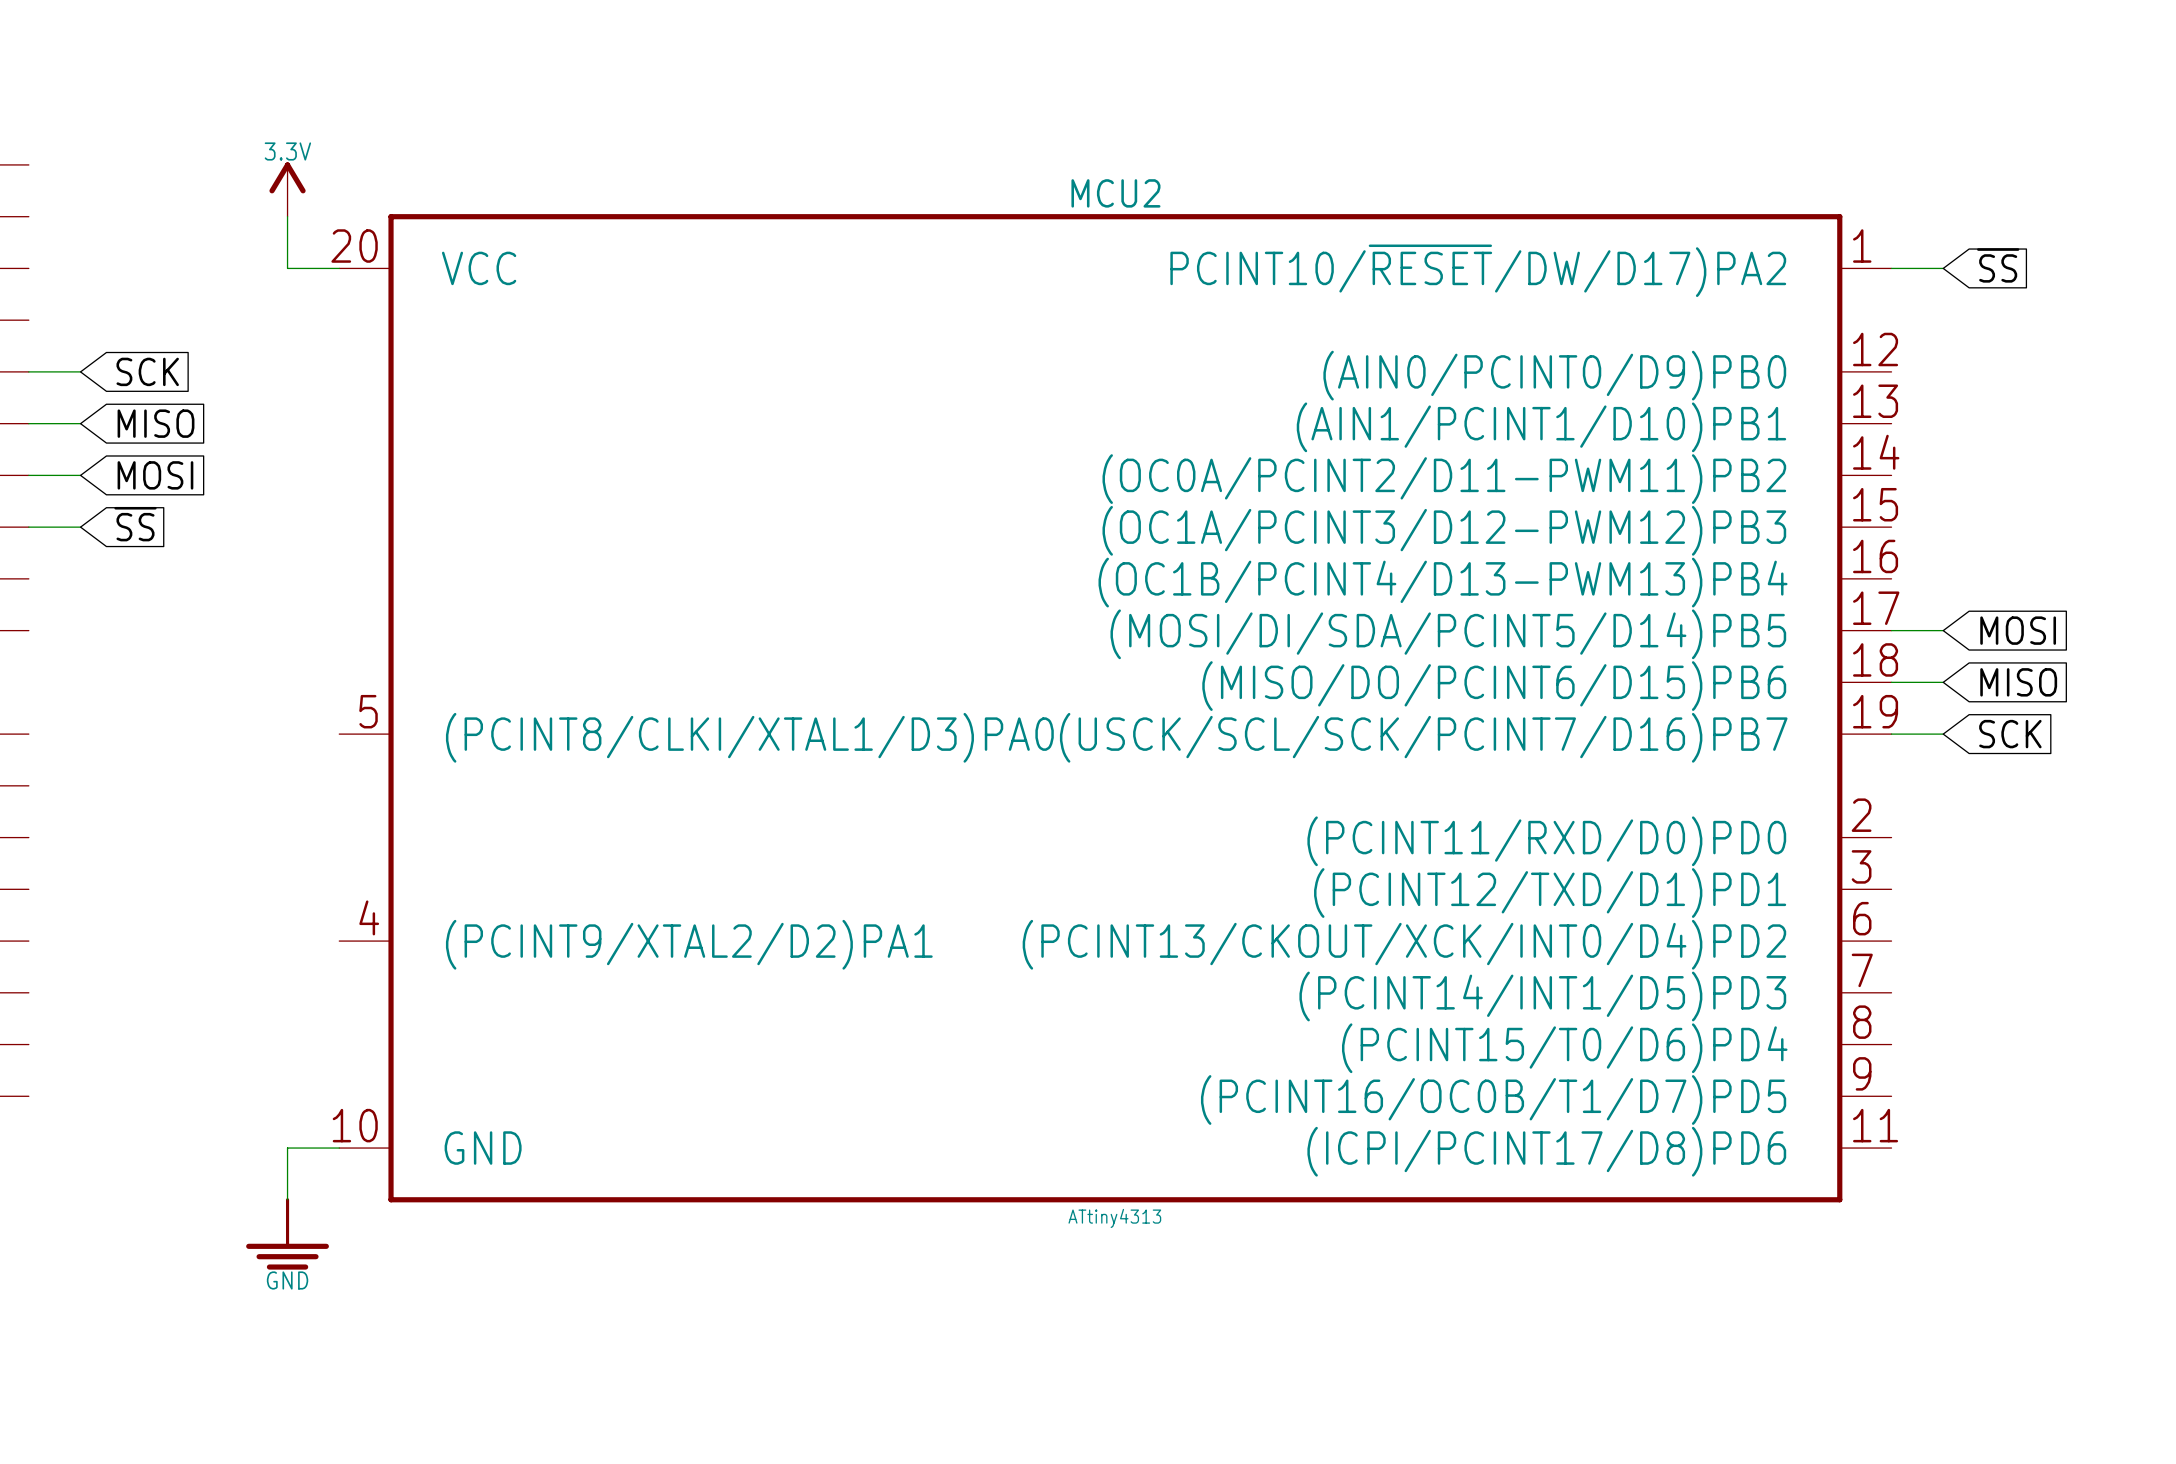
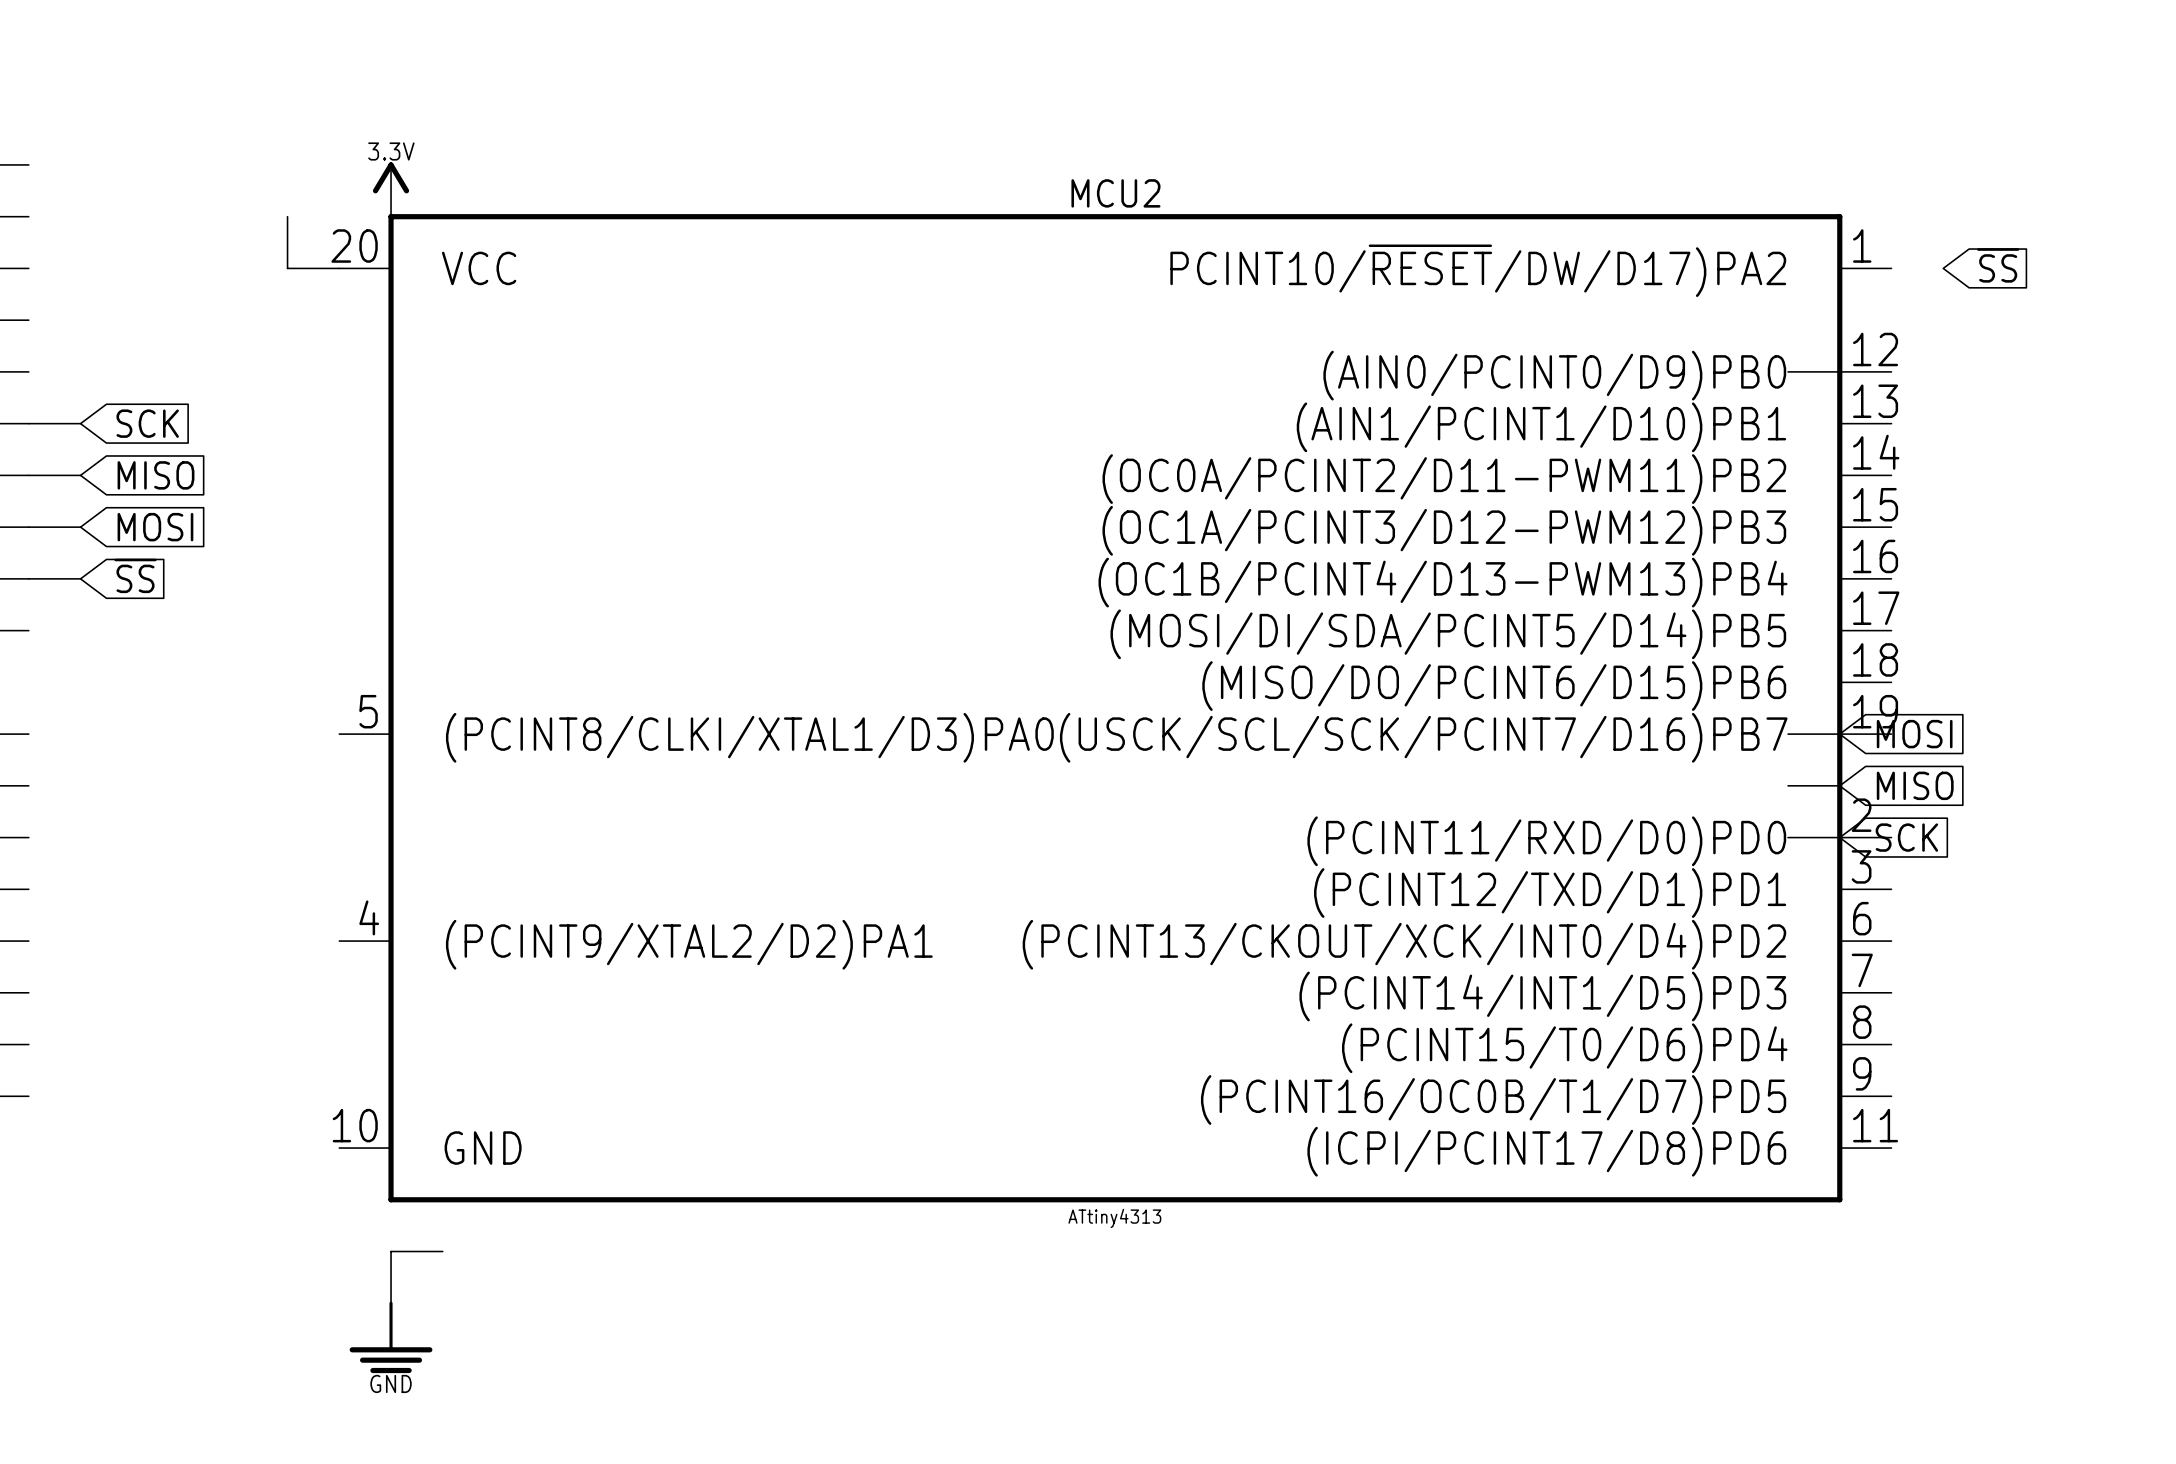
power symbol position: (287, 189) -> (391, 189)
wire: (1891, 268) (1943, 268) -> (1788, 371) (1839, 371)
wire: (28, 371) (80, 371) -> (28, 578) (80, 578)
global label: SCK (147, 371) -> none
global label: MISO (156, 423) -> SCK (147, 423)
global label: MOSI (155, 475) -> MISO (156, 475)
global label: ~{SS} (135, 524) -> MOSI (155, 527)
global label: none -> ~{SS} (135, 575)
wire: (1891, 630) (1943, 630) -> (1788, 734) (1839, 734)
global label position: MOSI (2018, 630) -> MOSI (1914, 734)
wire: (1891, 682) (1943, 682) -> (1788, 785) (1839, 785)
global label position: MISO (2018, 682) -> MISO (1915, 785)
wire: (1891, 734) (1943, 734) -> (1788, 837) (1839, 837)
global label position: SCK (2010, 734) -> SCK (1906, 837)
wire: (339, 1148) (287, 1148) (287, 1199) -> (442, 1251) (391, 1251) (391, 1303)
power symbol position: (287, 1233) -> (391, 1337)

